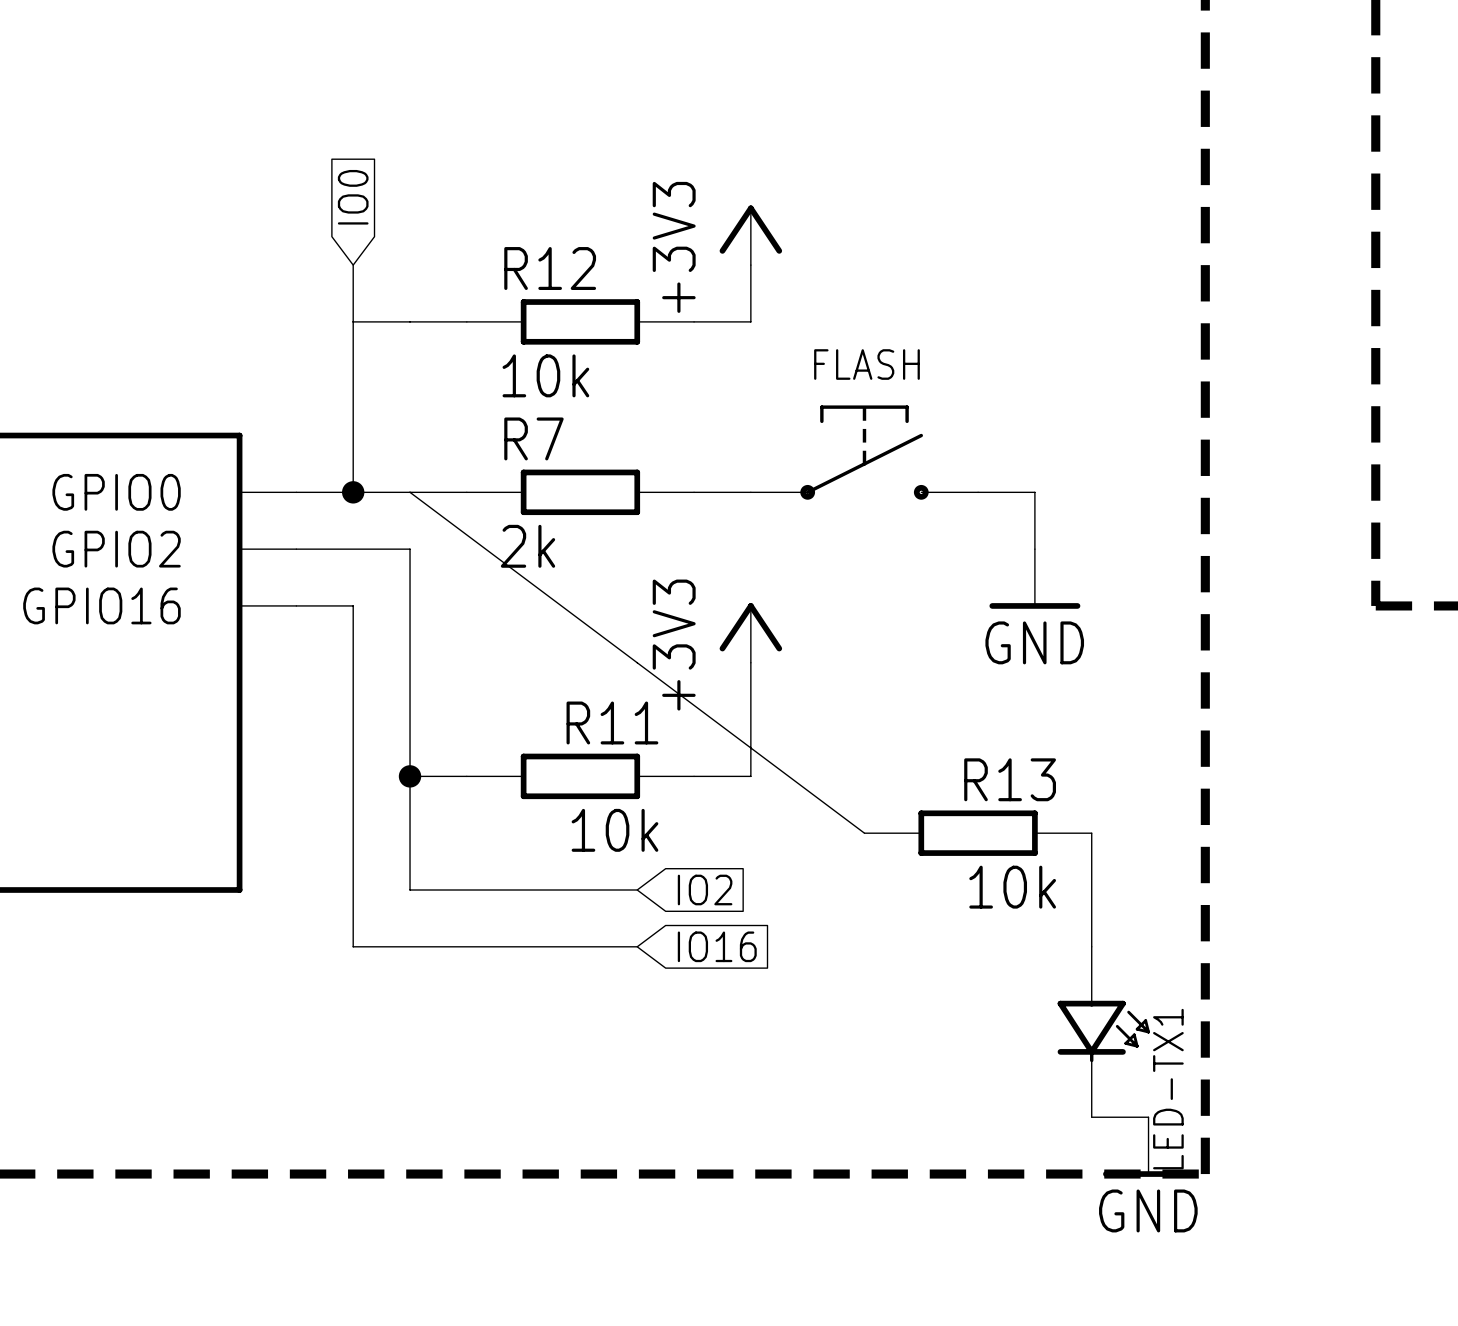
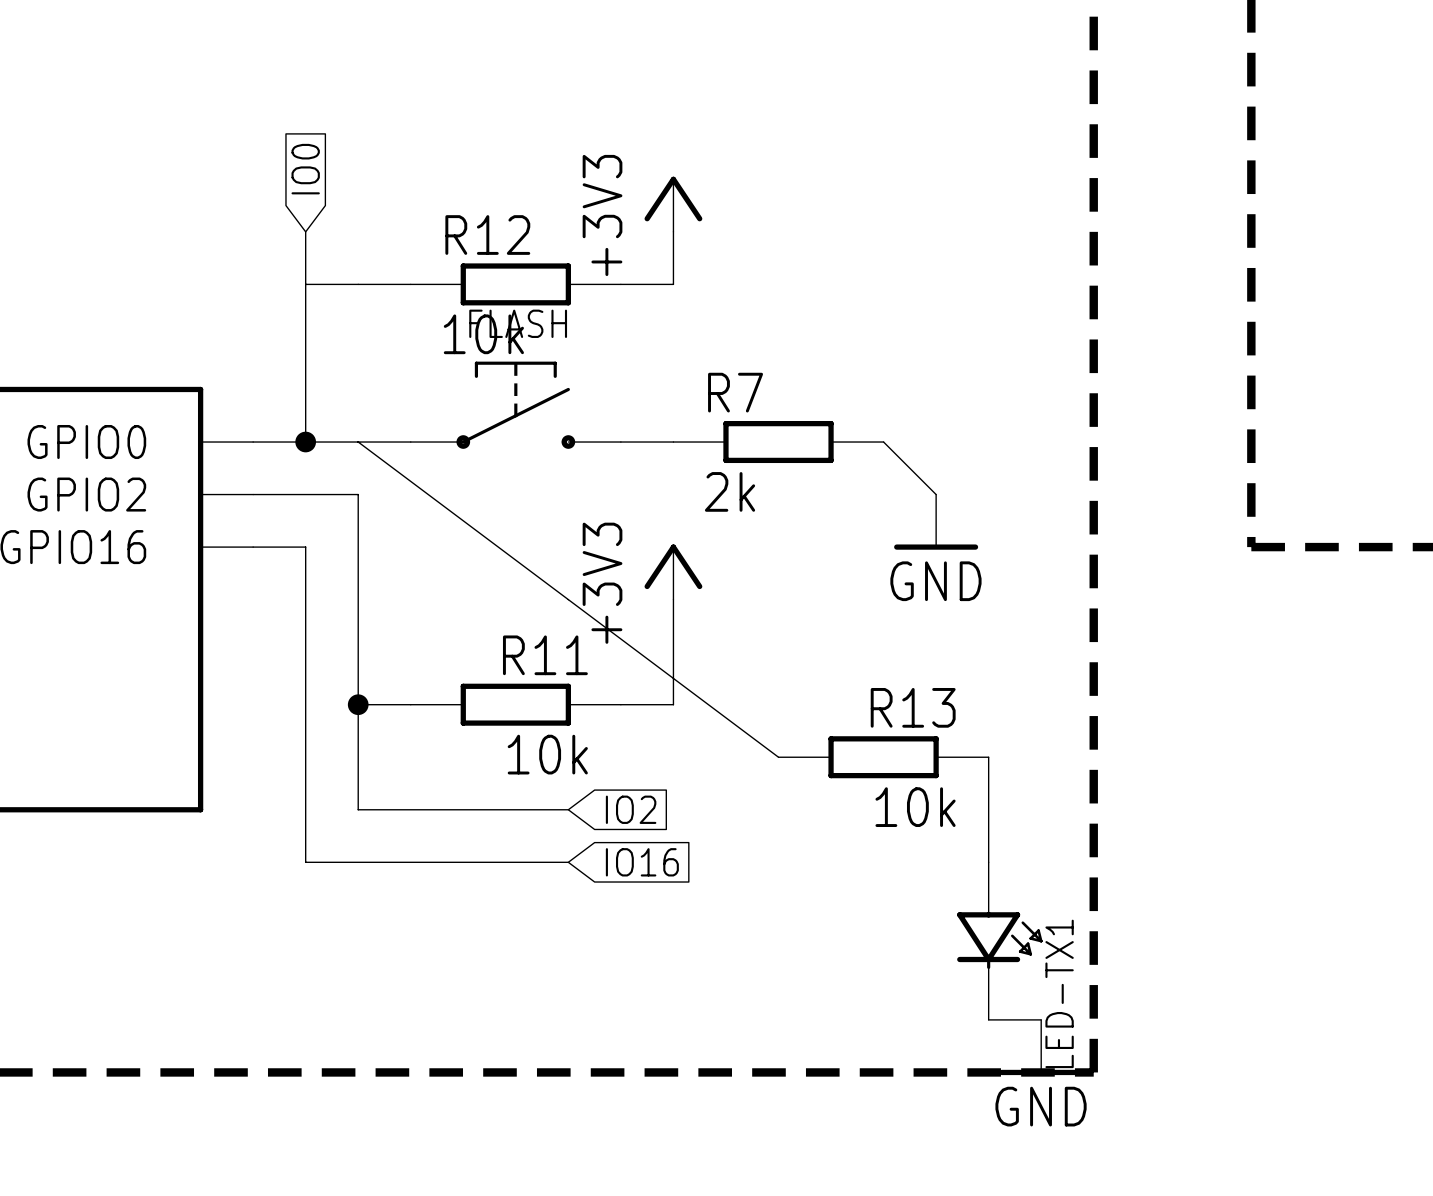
FLASH position: (864, 452) -> (515, 405)
R7 position: (580, 492) -> (778, 442)
wire: (978, 492) (1034, 492) (1034, 549) -> (883, 442) (936, 494)

